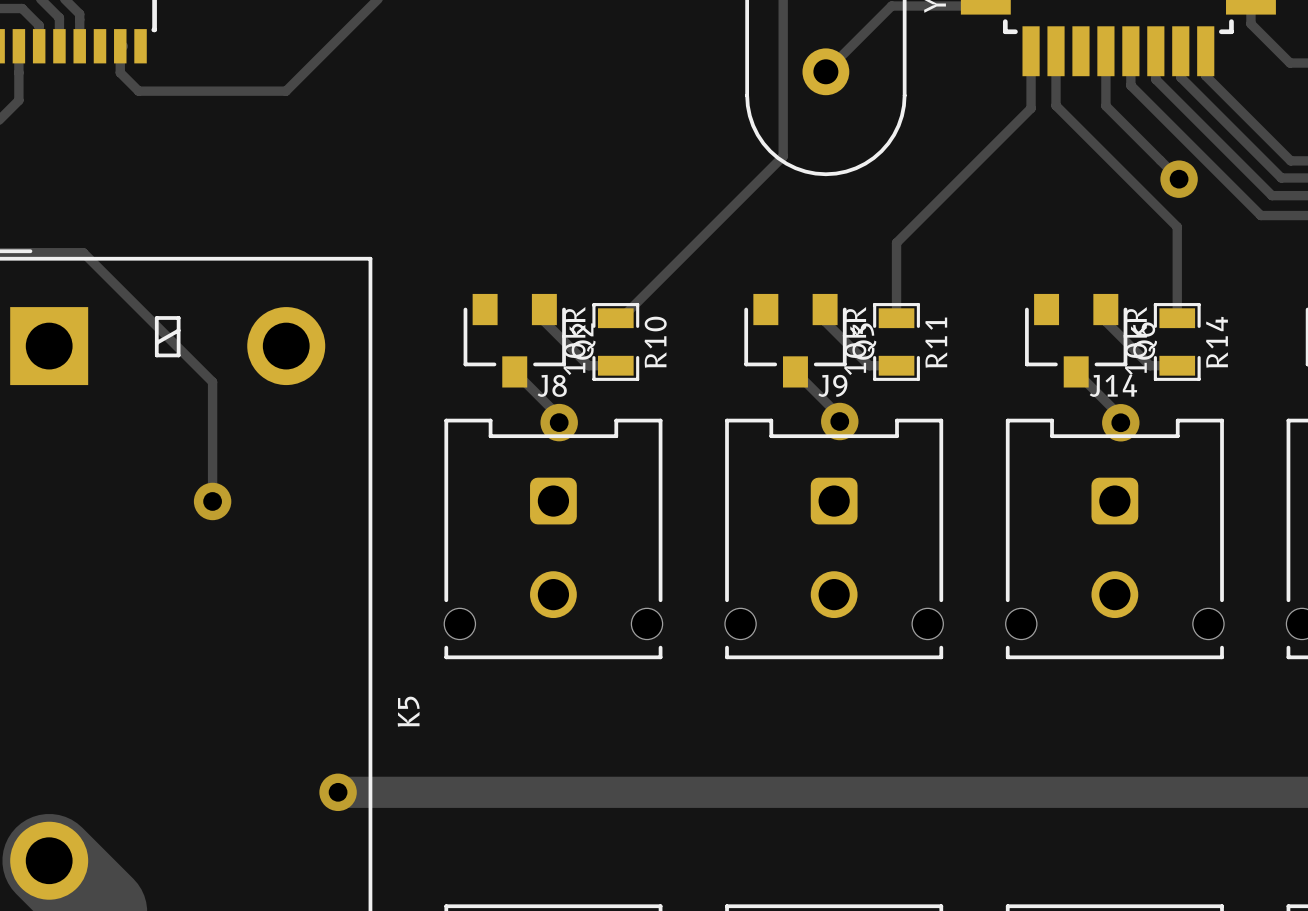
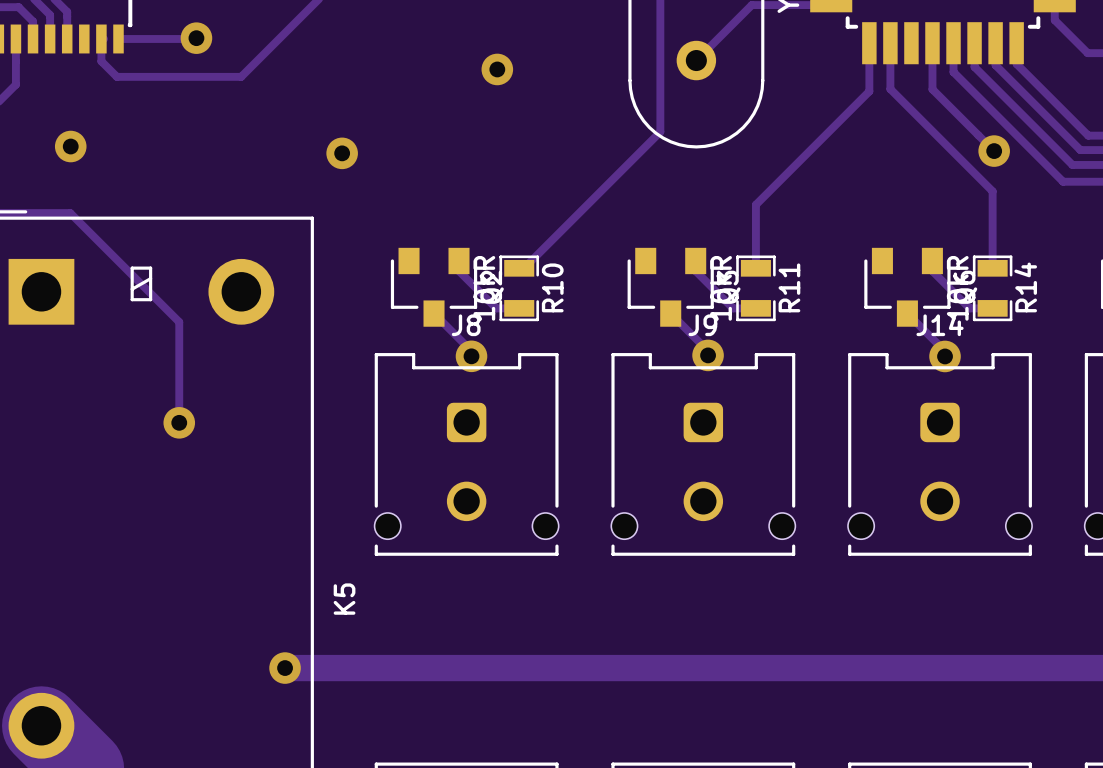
track: none -> (196, 38) (118, 38)
via: none -> (196, 38)
via: none -> (497, 69)
via: none -> (70, 146)
via: none -> (342, 153)

